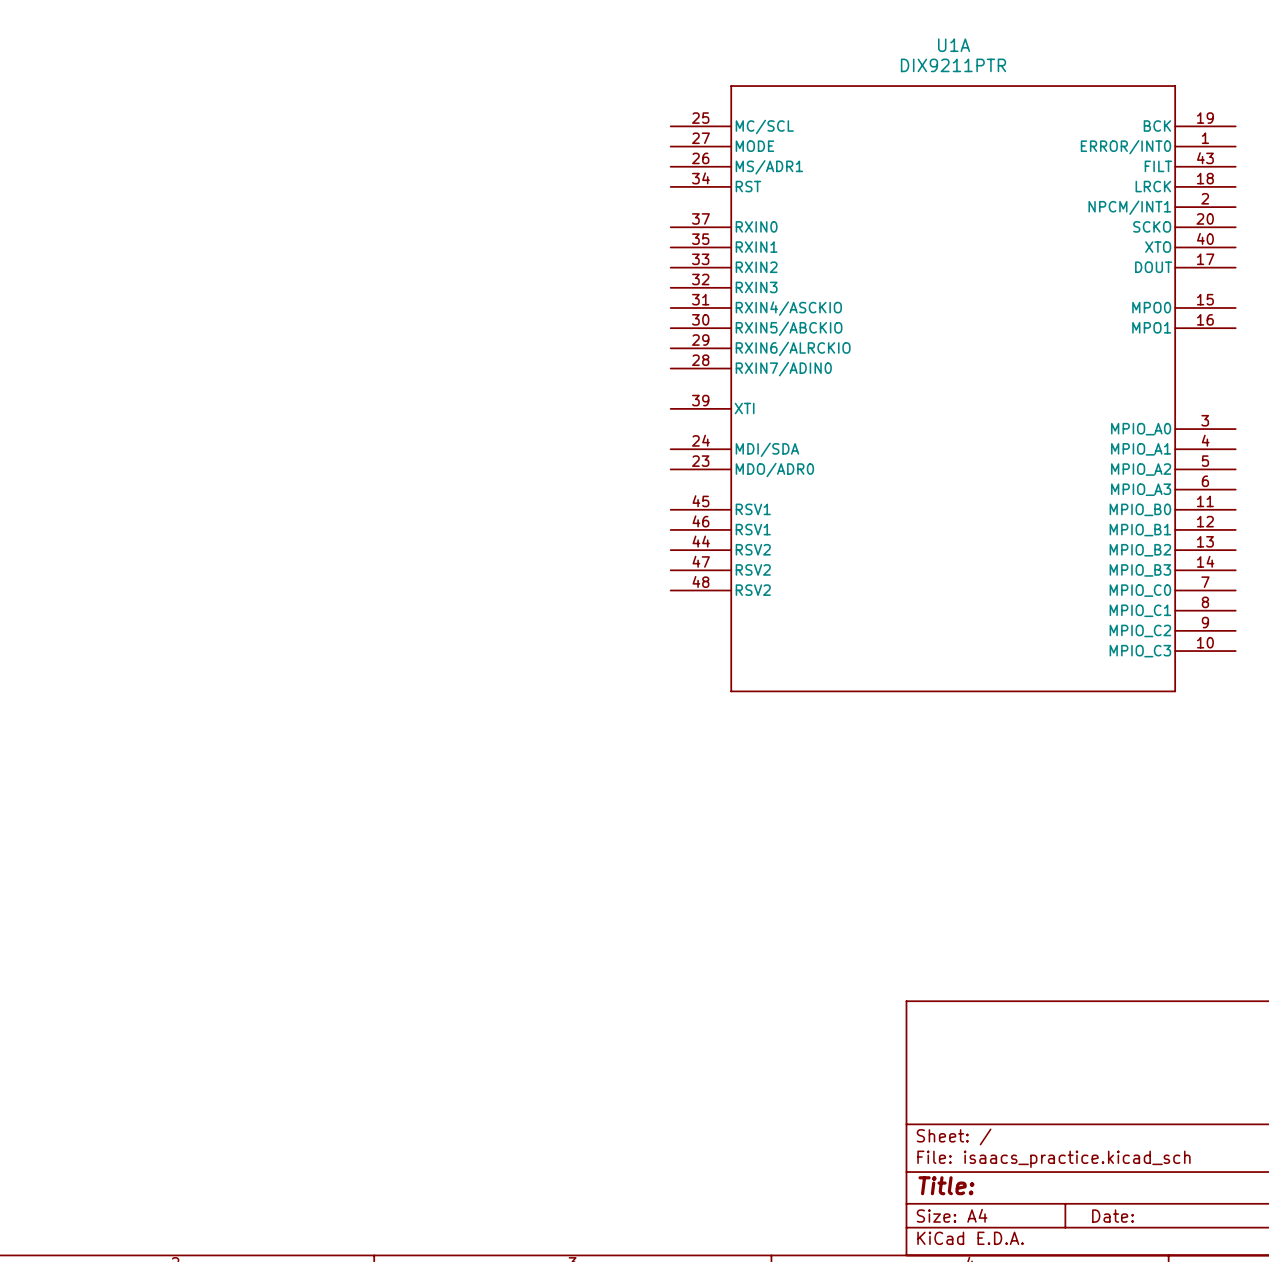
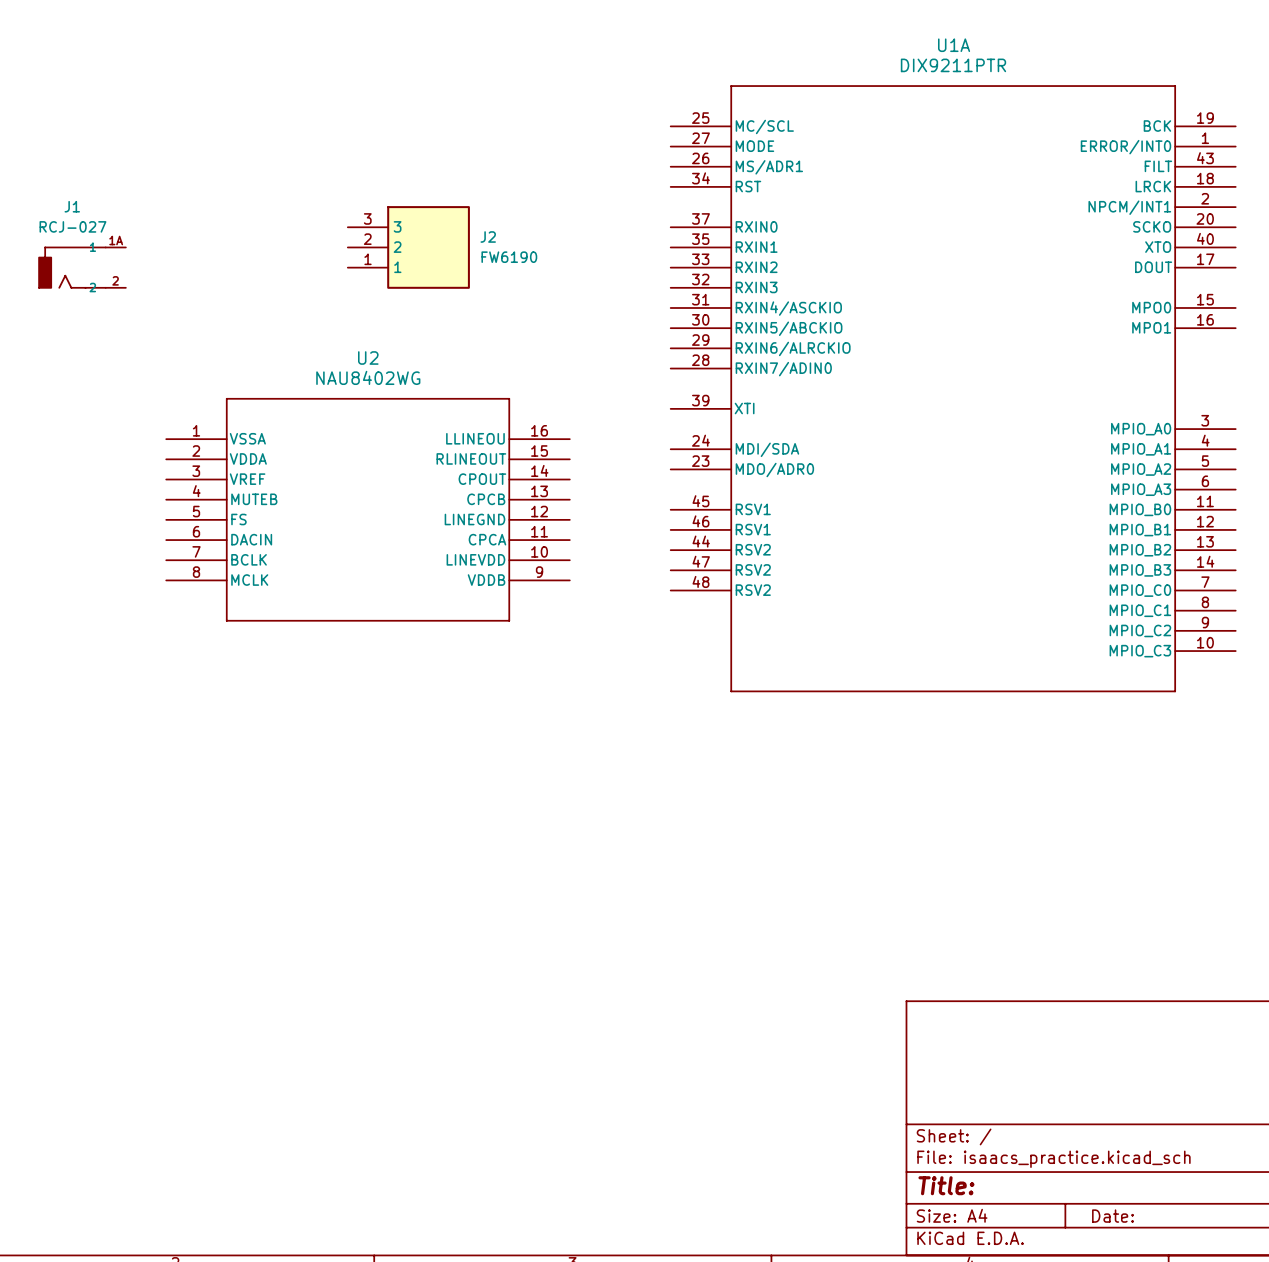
J2: none -> FW6190 (408, 247)
J1: none -> RCJ-027 (82, 267)
U2: none -> NAU8402WG (368, 509)

